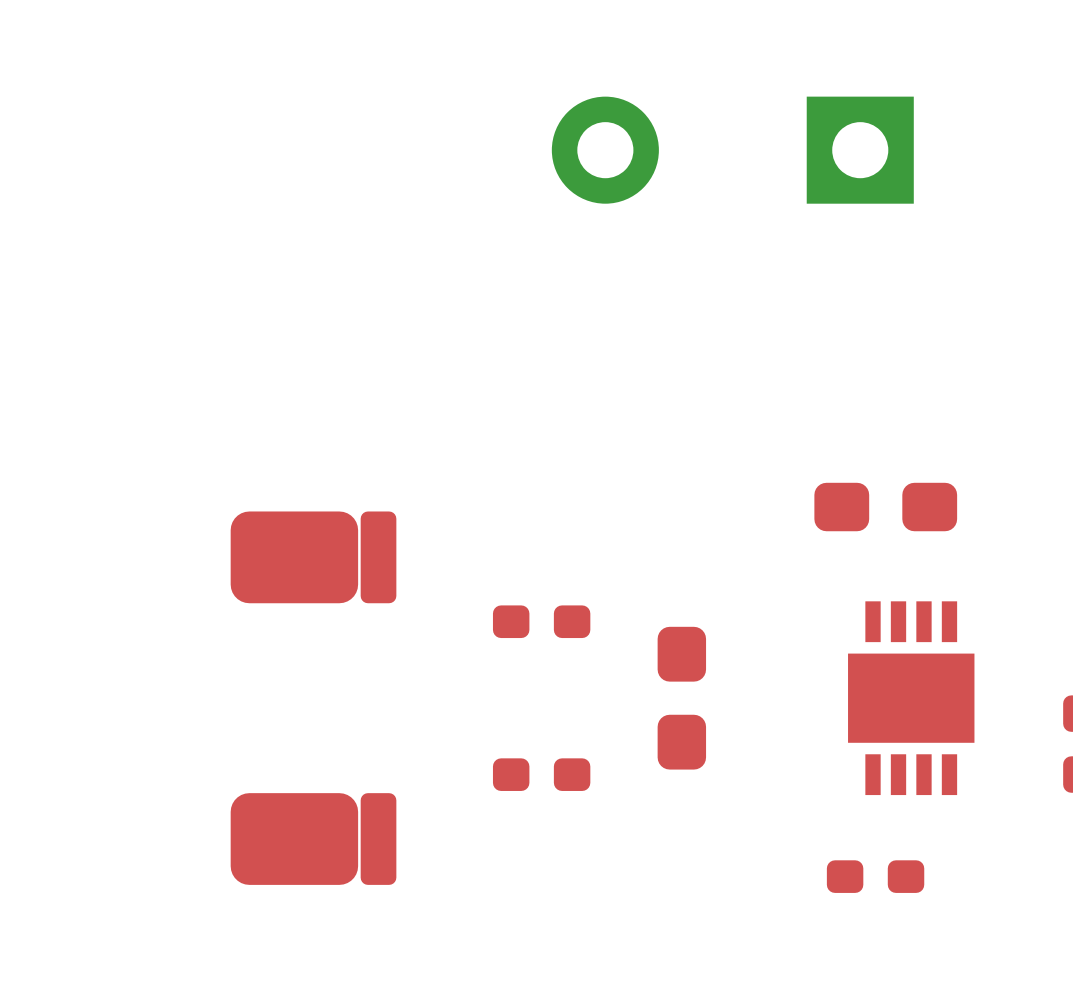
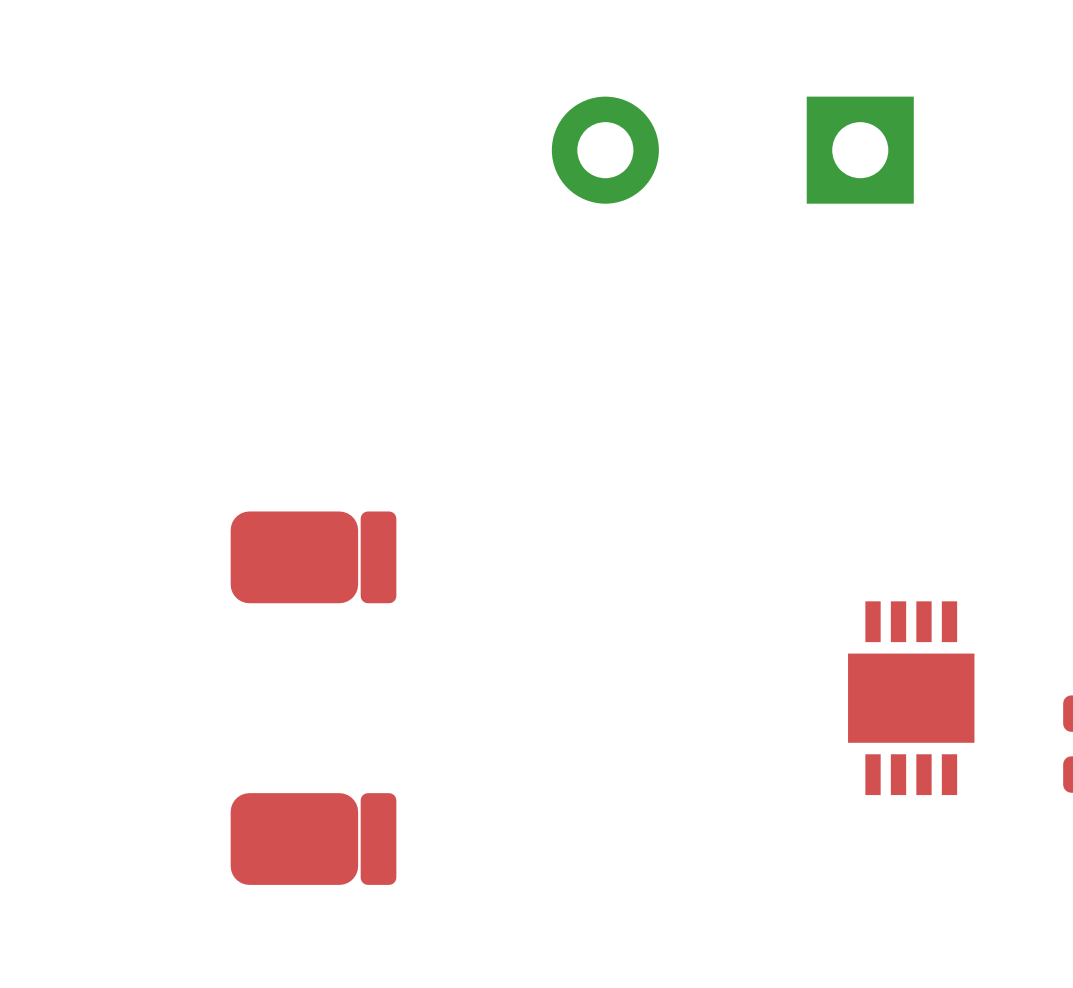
part: (885, 507) -> none
part: (541, 621) -> none
part: (681, 698) -> none
part: (541, 774) -> none
part: (875, 876) -> none

